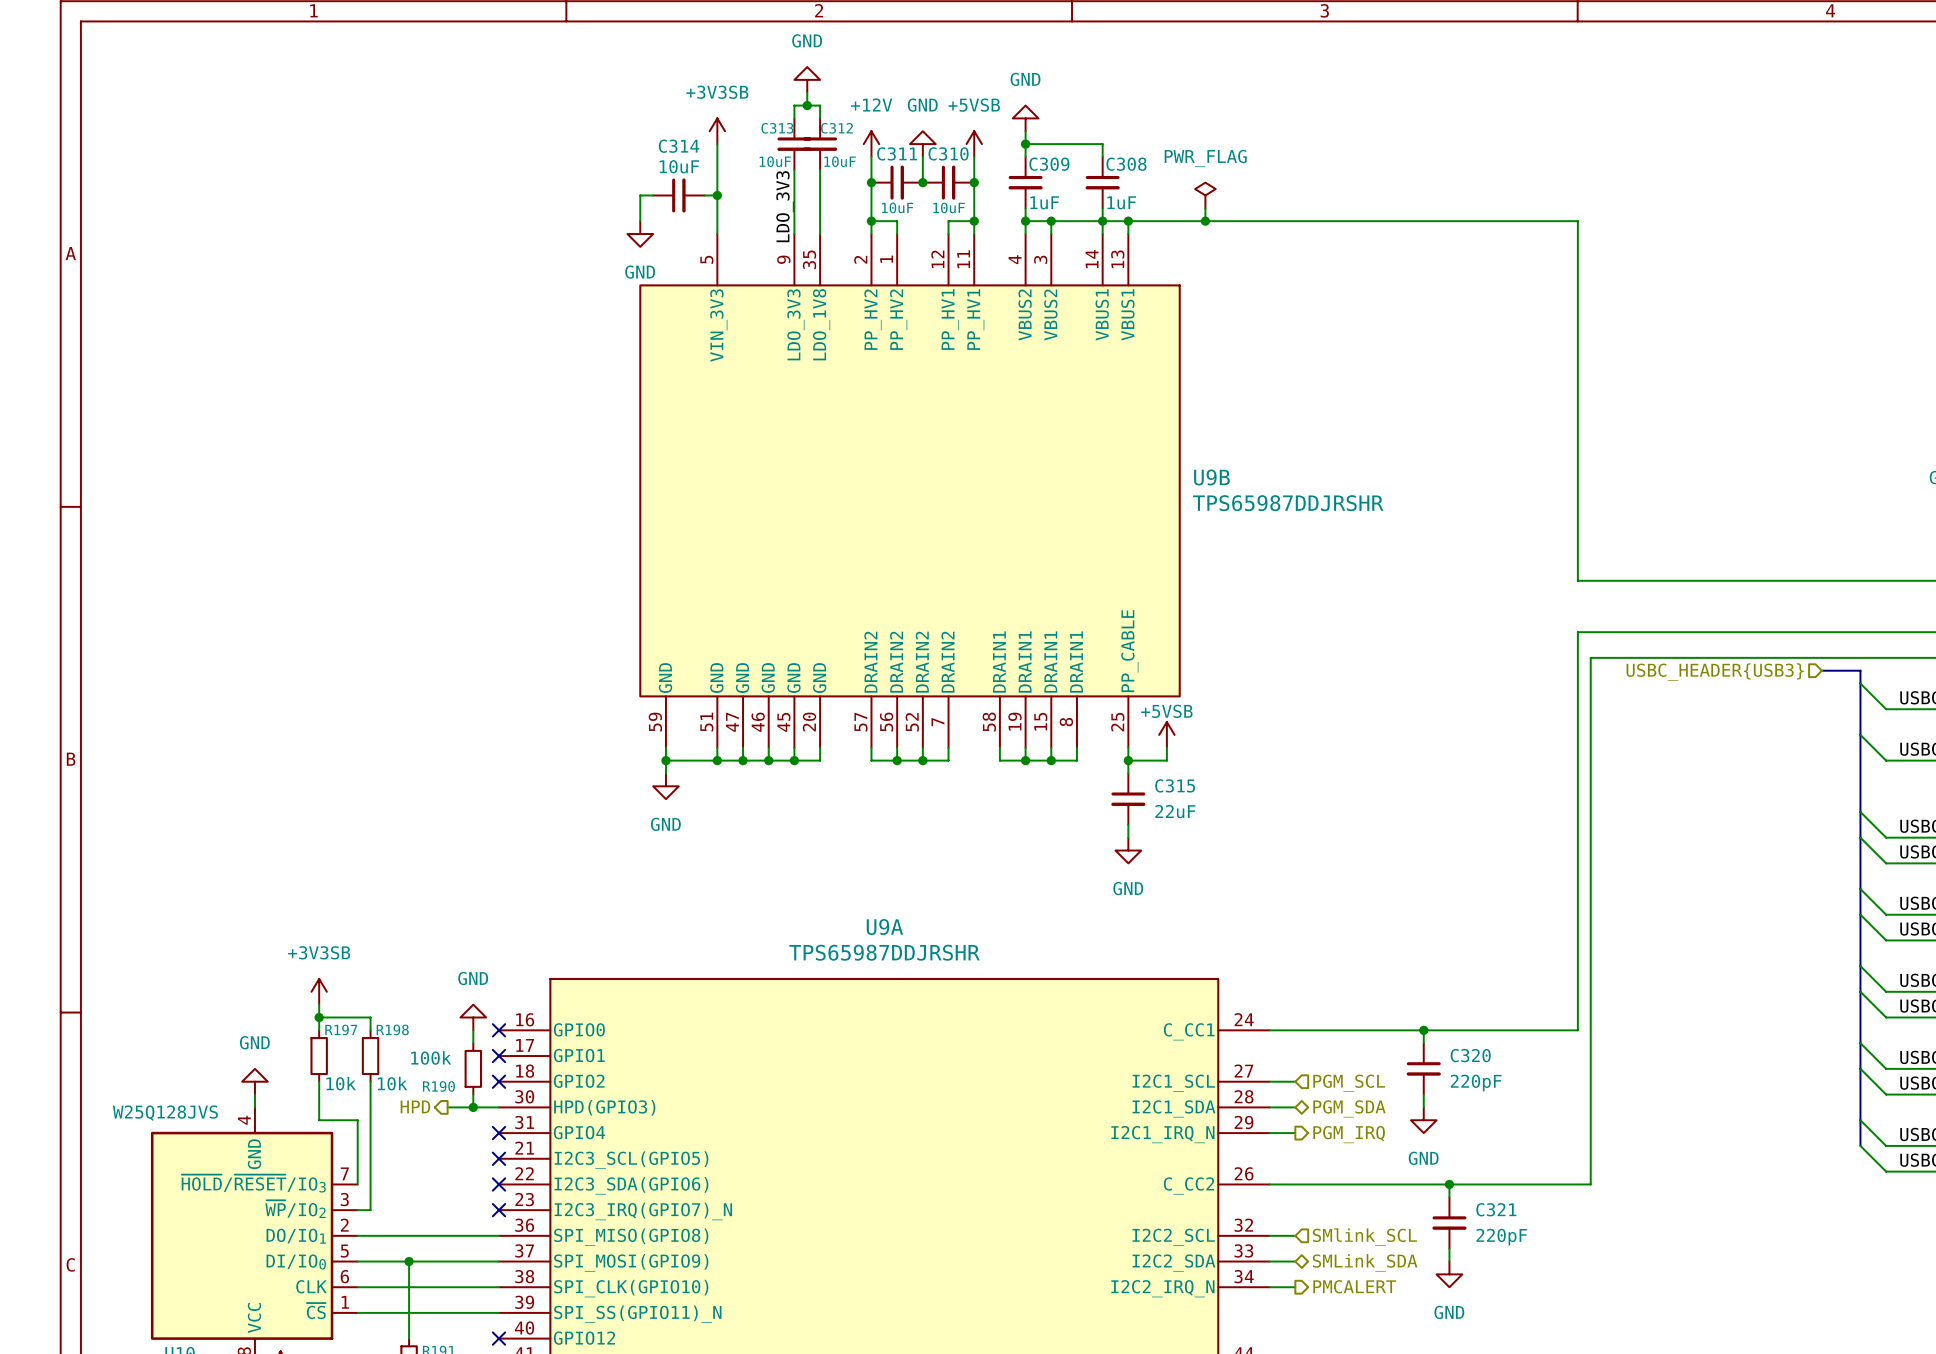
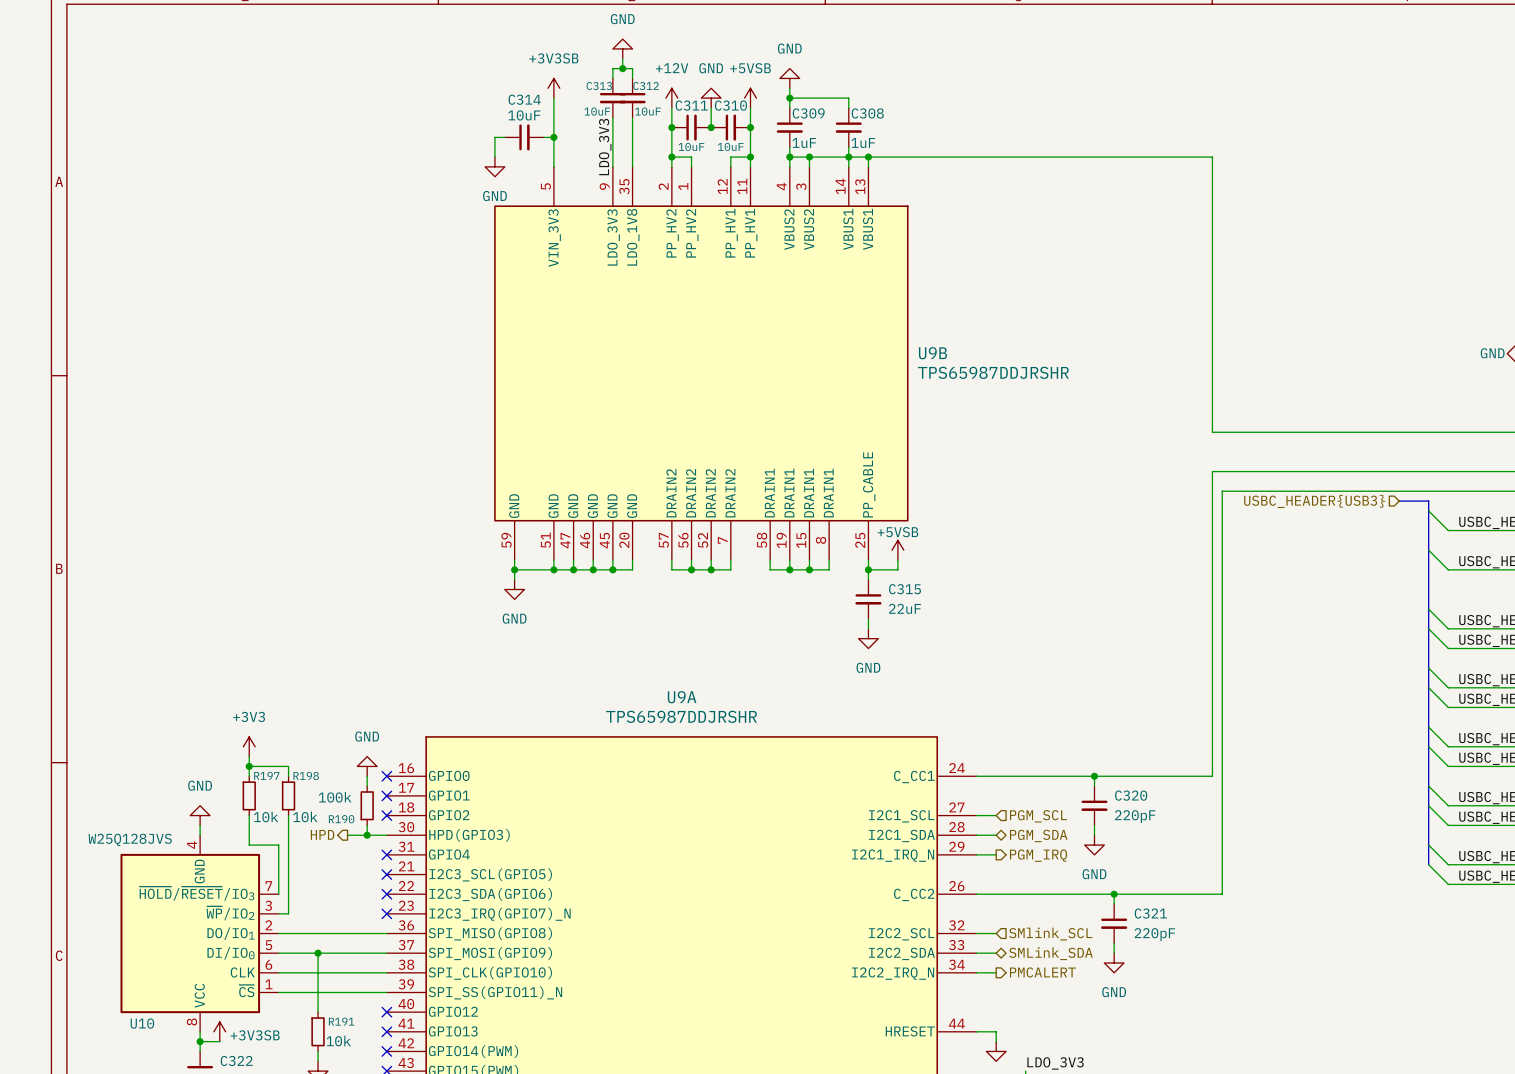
power symbol: PWR_FLAG (1205, 195) -> none
wire: (1205, 208) (1205, 221) -> none
junction: (1205, 221) -> none
power symbol: +3V3SB (319, 991) -> +3V3 (249, 746)

